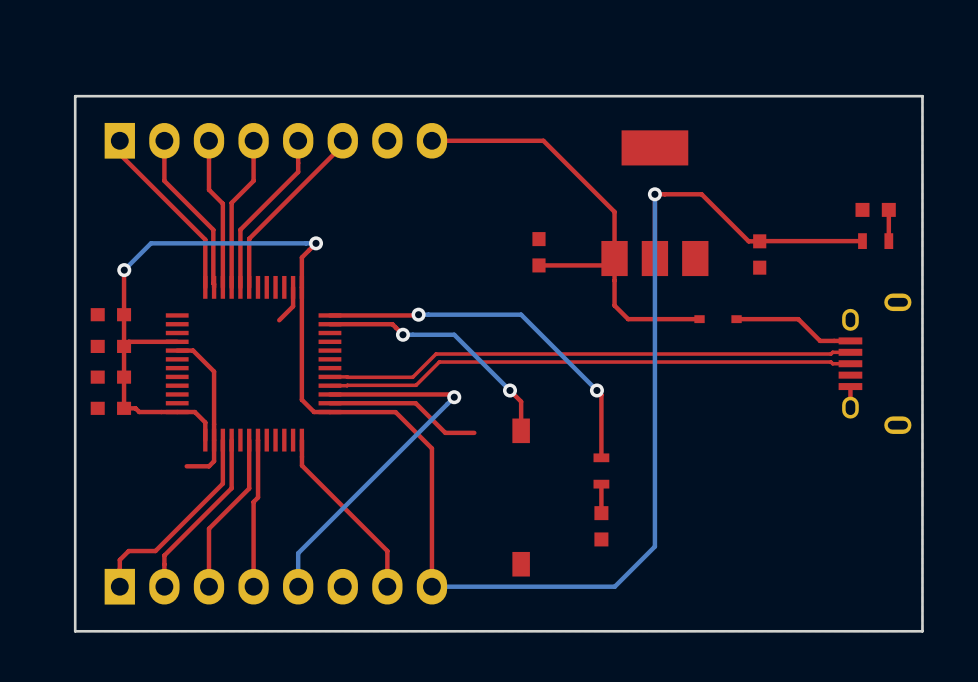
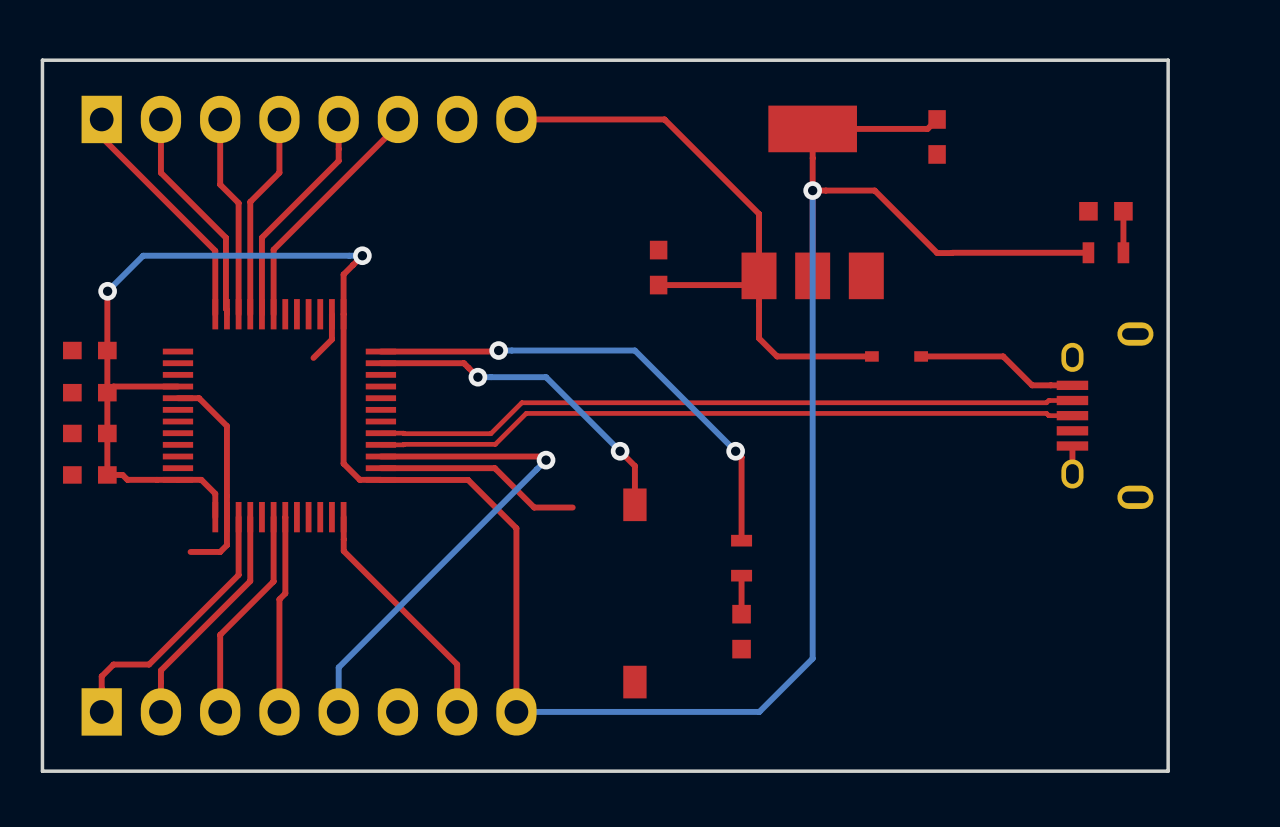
top track: none -> (937, 119) (927, 128) (812, 128) (812, 190)
part position: (759, 254) -> (937, 136)

